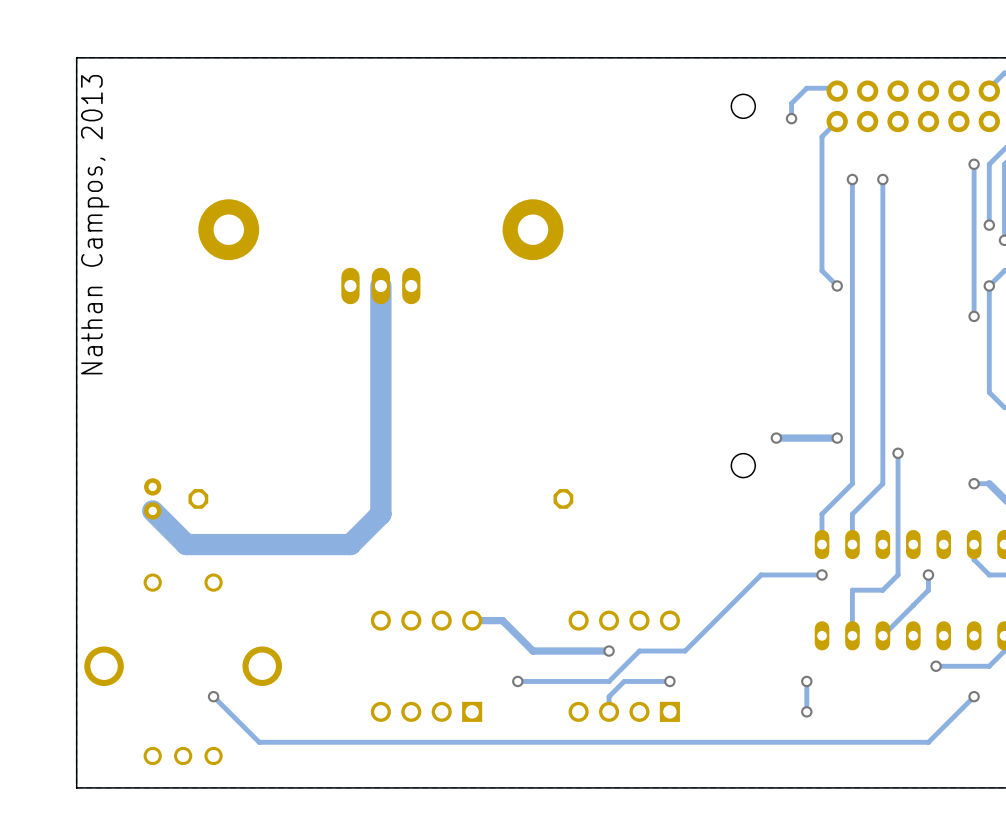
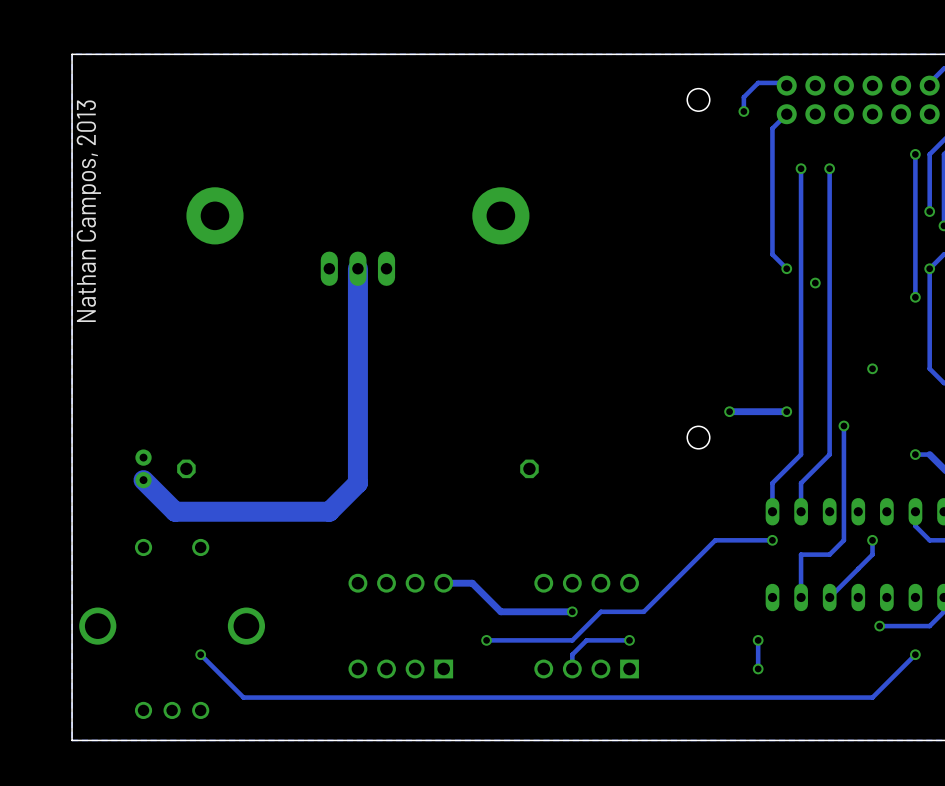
via: none -> (815, 283)
via: none -> (872, 368)

